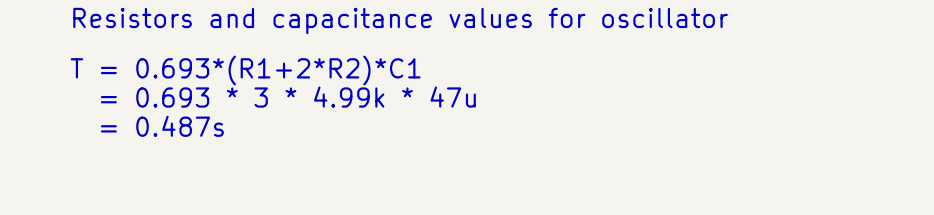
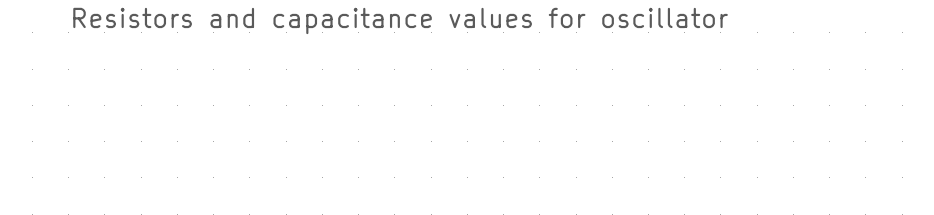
text: T = 0.693*(R1+2*R2)*C1 (245, 70) -> none
text: = 0.693 * 3 * 4.99k * 47u (288, 97) -> none
text: = 0.487s (162, 126) -> none

